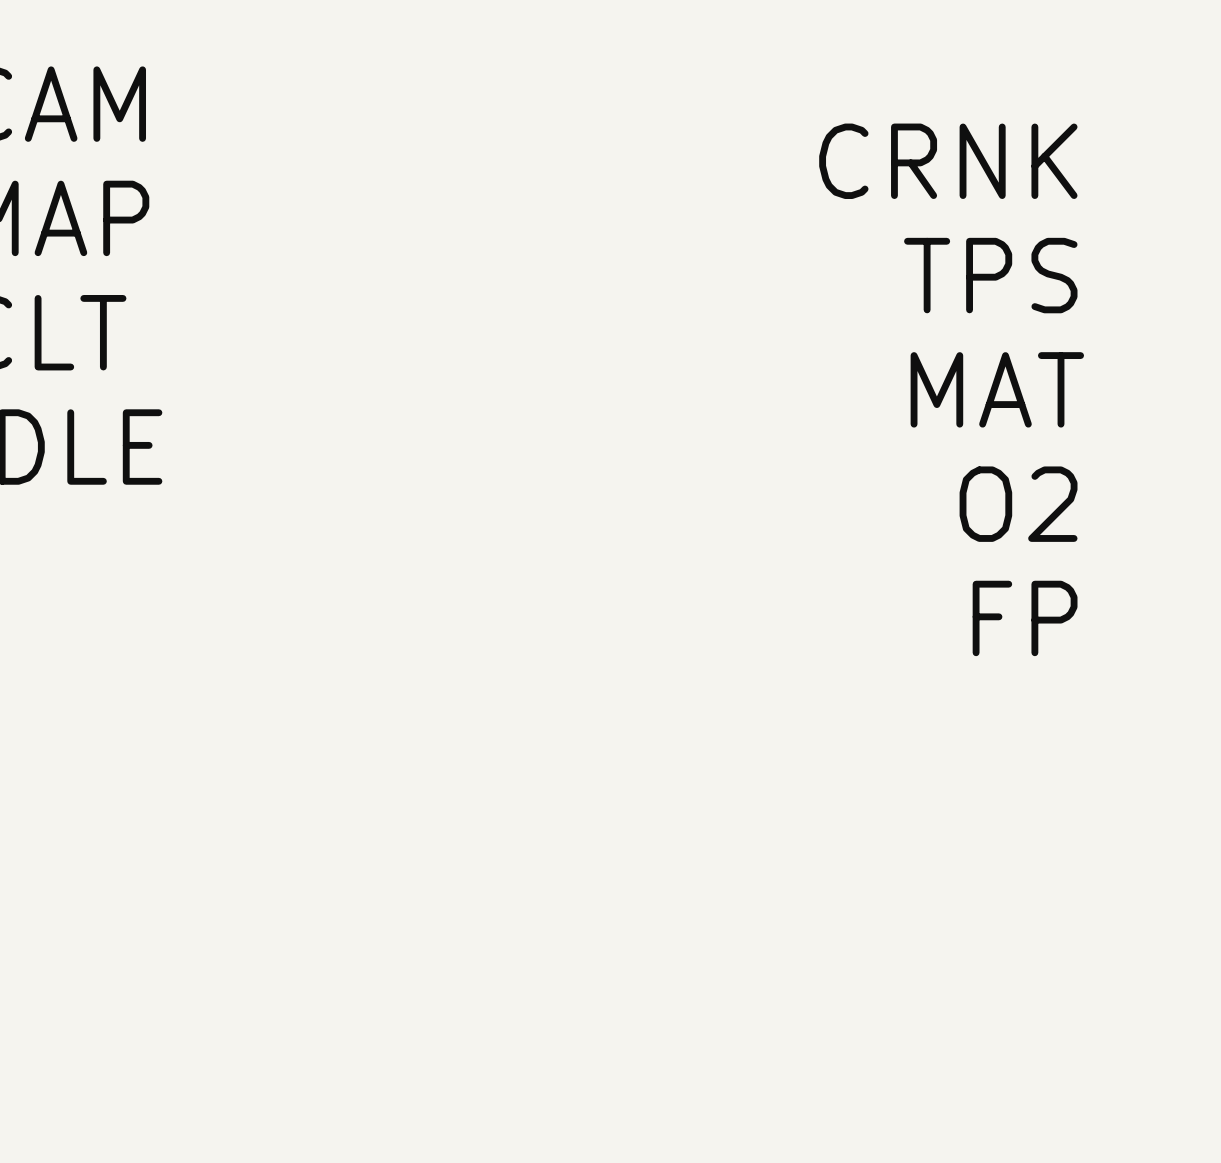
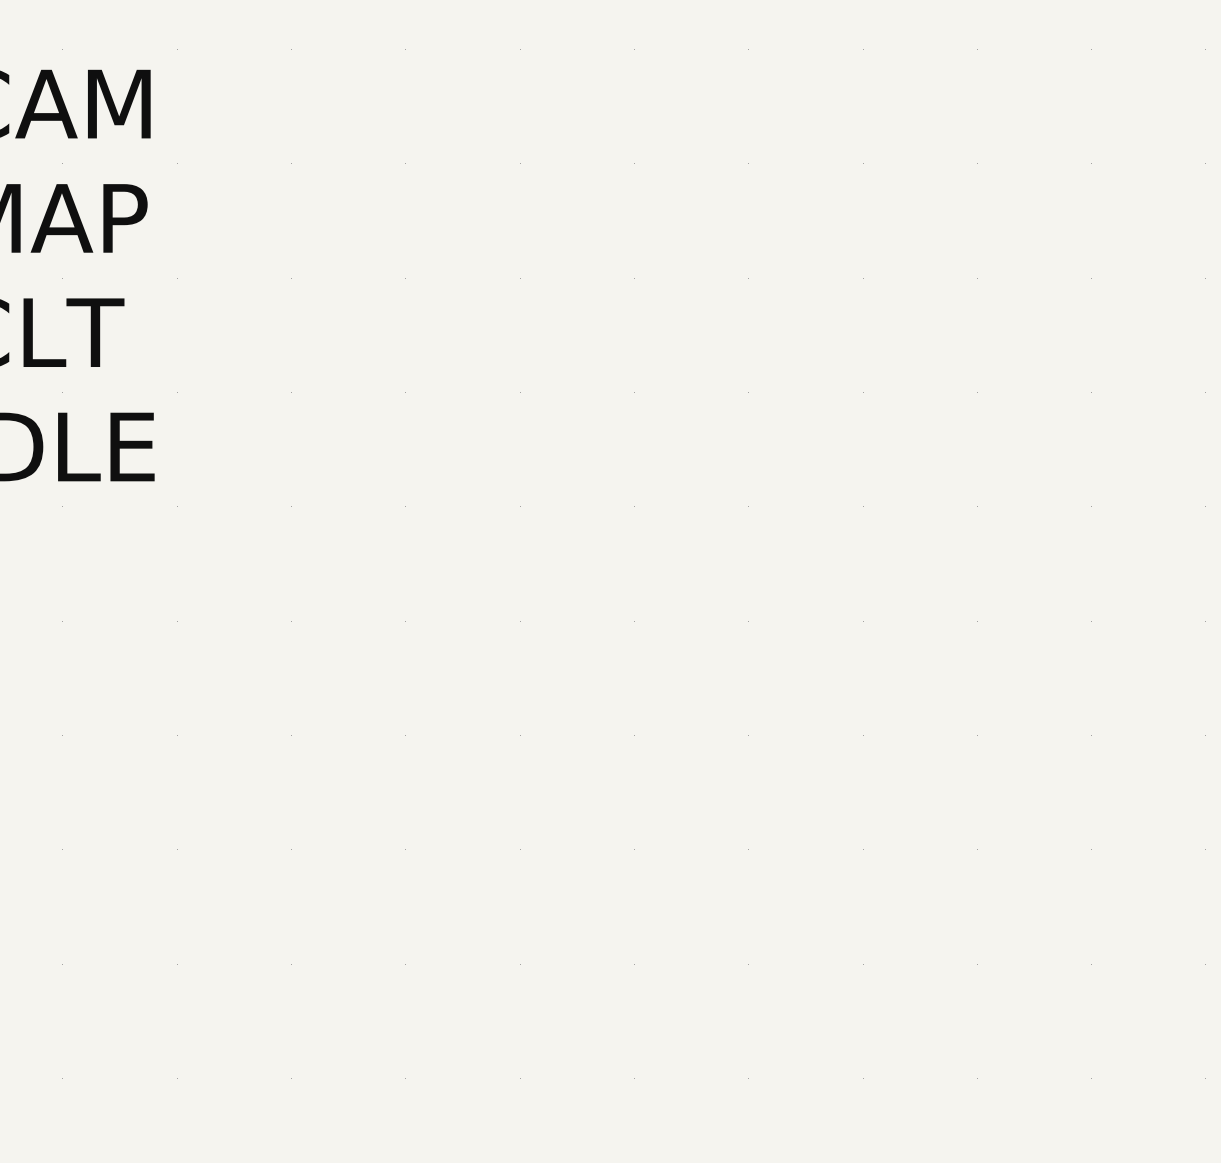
label: CRNK (948, 161) -> none
label: TPS (990, 275) -> none
label: MAT (997, 389) -> none
label: O2 (1018, 504) -> none
label: FP (1025, 618) -> none

